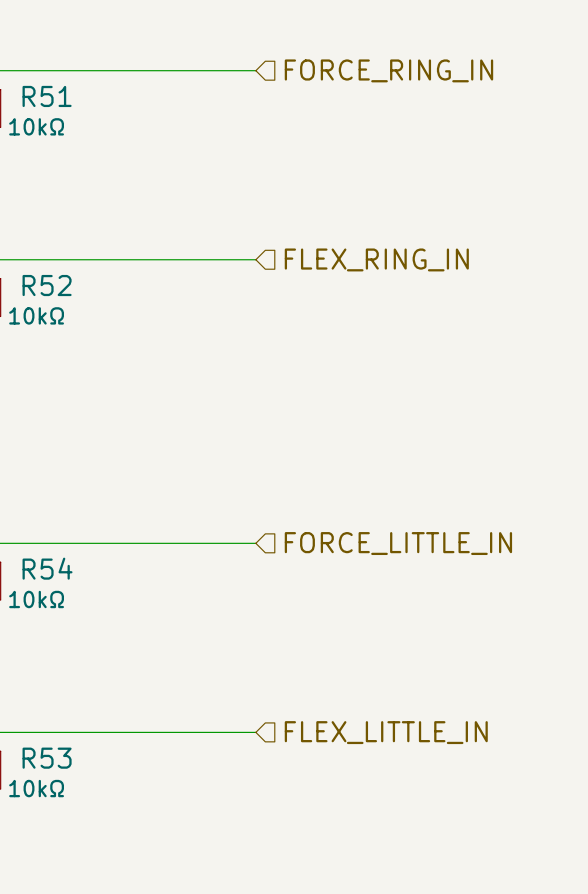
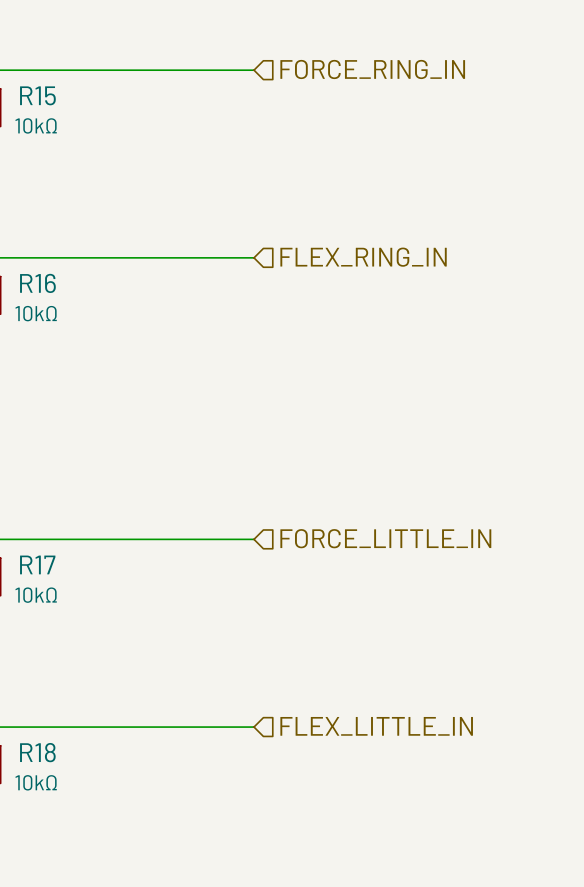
R51 name: R51 (47, 96) -> R15 (37, 95)
R52 name: R52 (47, 285) -> R16 (37, 283)
R54 name: R54 (47, 568) -> R17 (37, 564)
R53 name: R53 (47, 758) -> R18 (37, 752)

